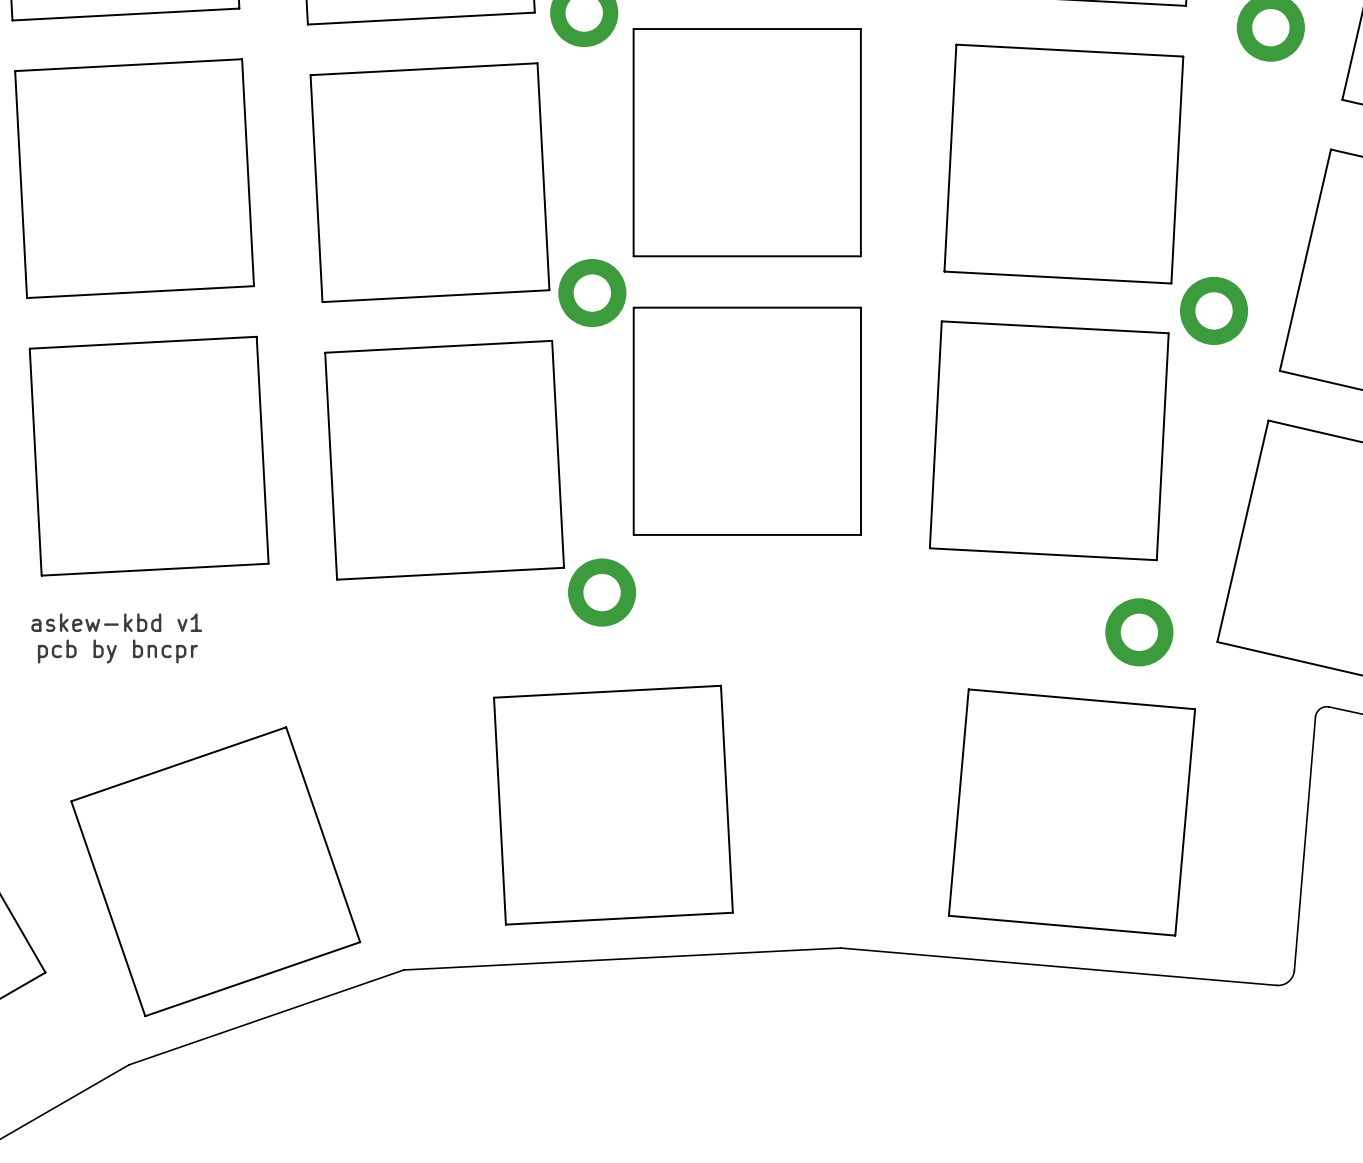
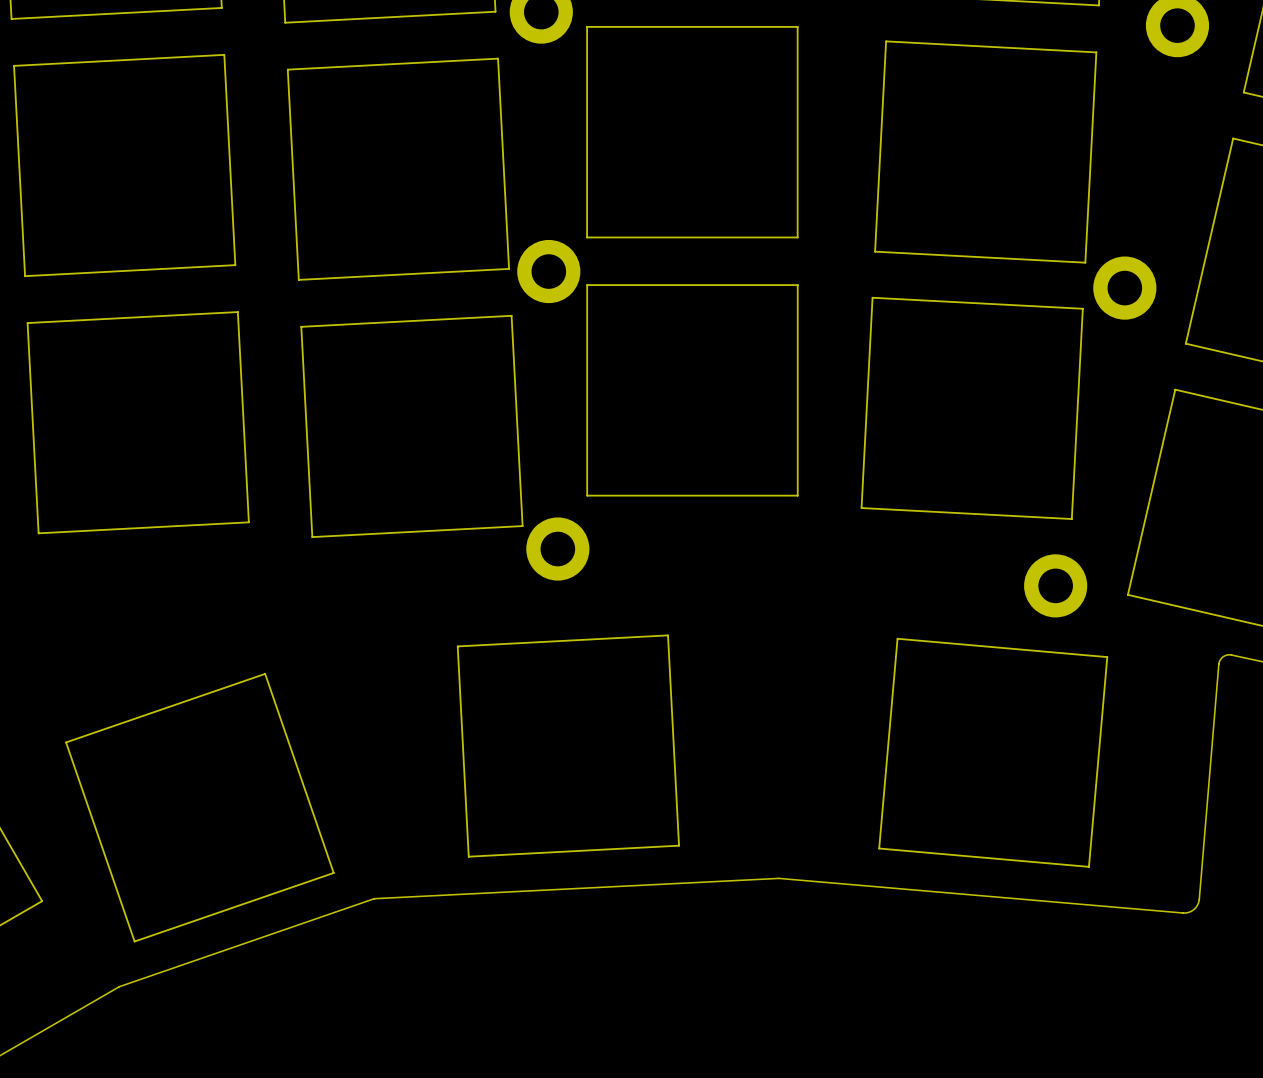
text: askew-kbd v1 (116, 622) -> none
text: pcb by bncpr (117, 651) -> none

